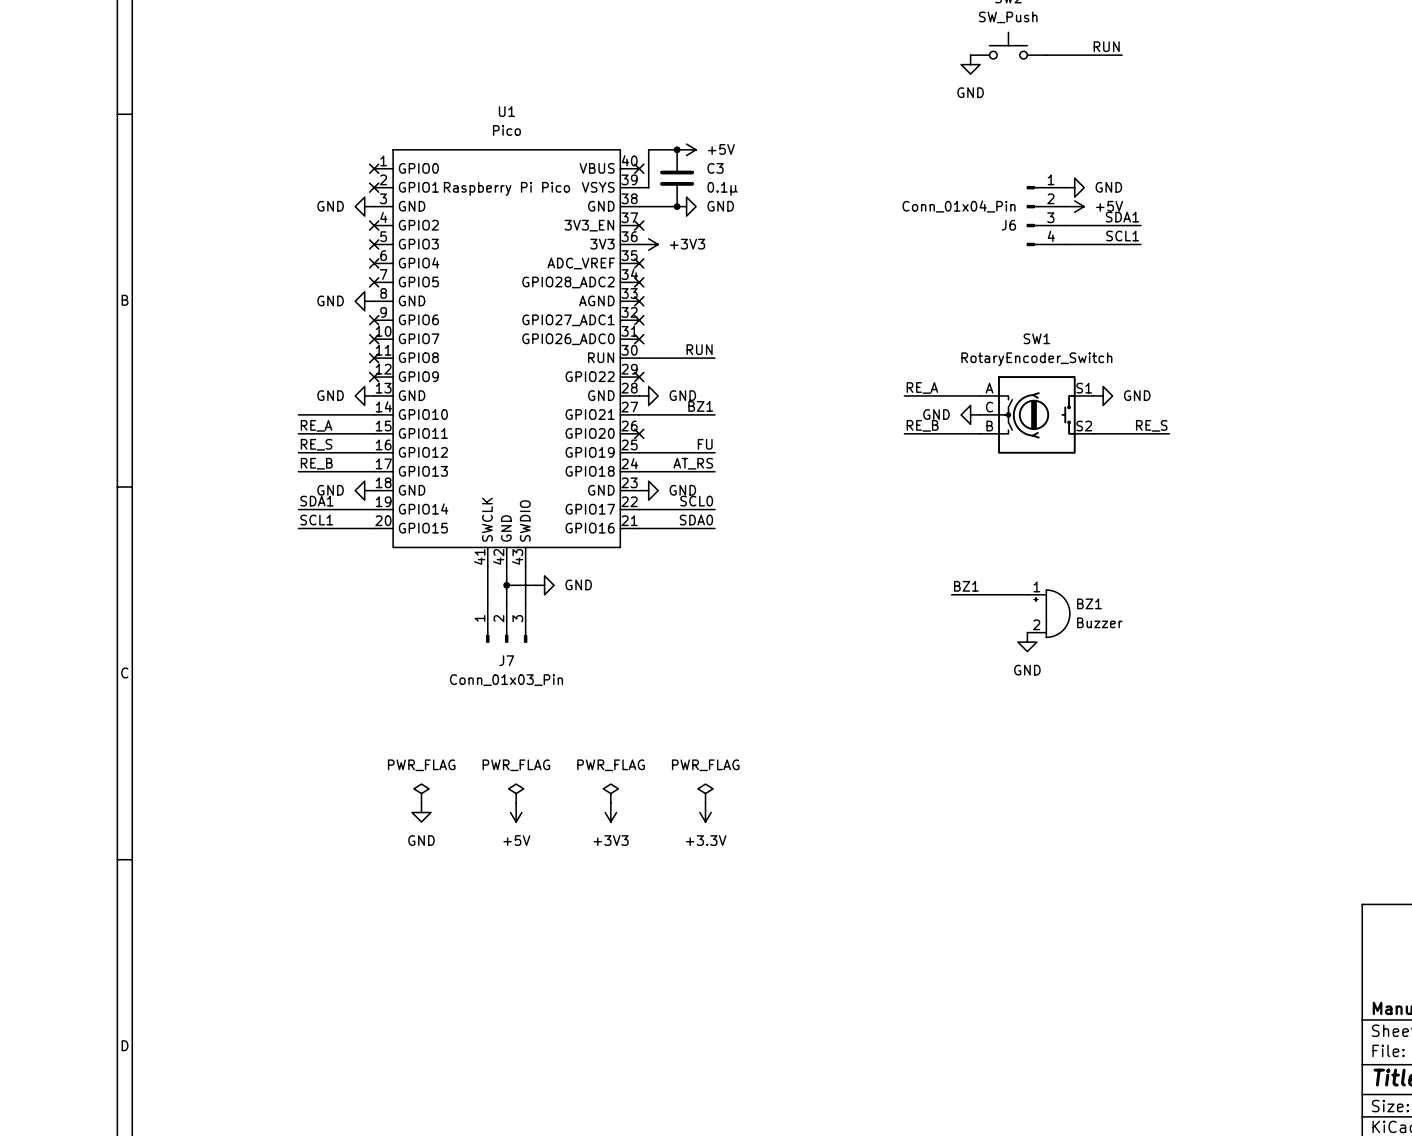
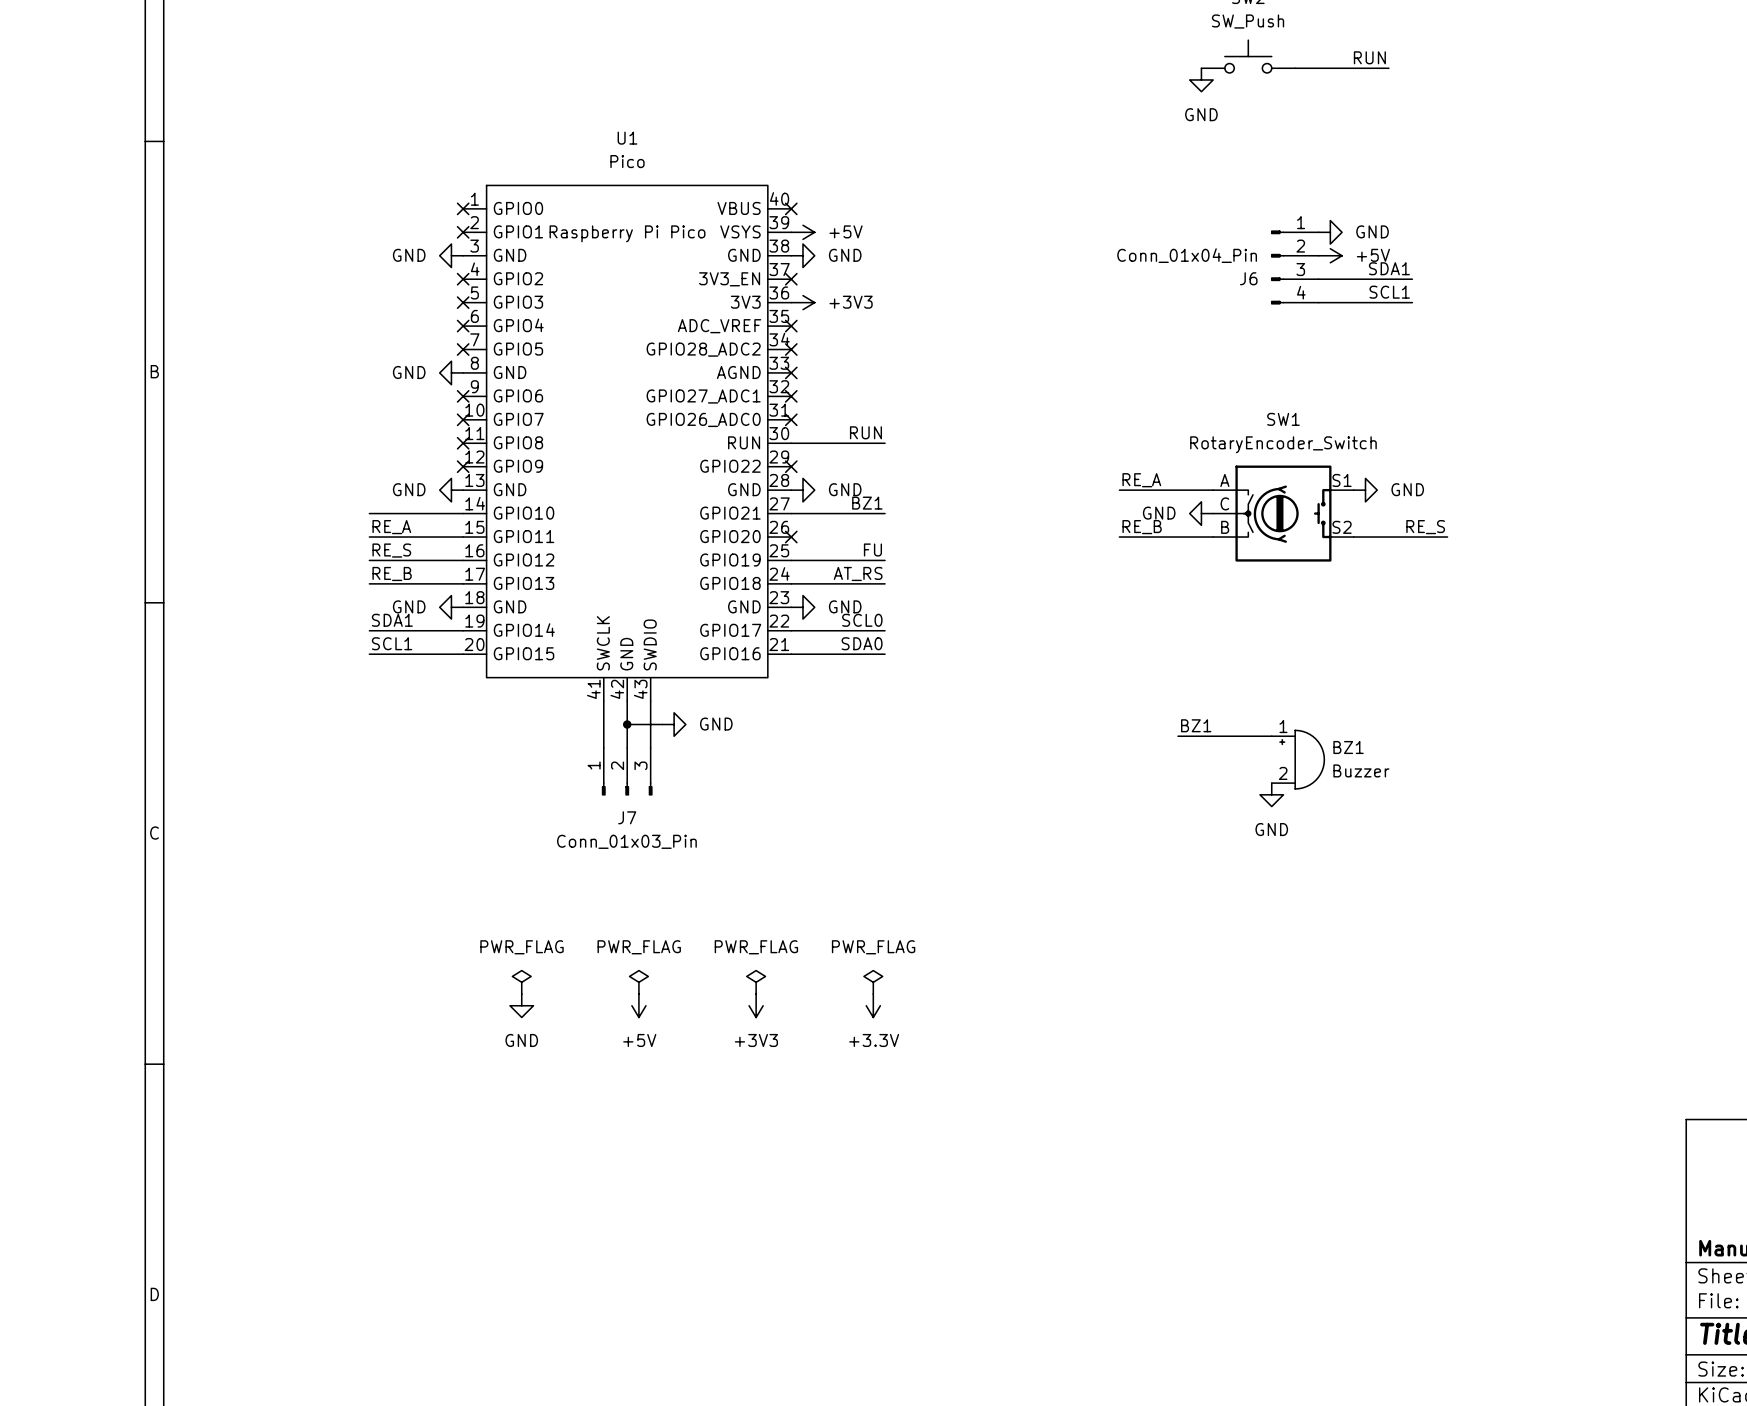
wire: (677, 149) (648, 149) (648, 187) (639, 187) -> none
junction: (677, 149) -> none
power symbol position: +5V (686, 149) -> +5V (802, 232)
C3: 0.1μ (677, 178) -> none
wire: (639, 206) (677, 206) -> none
junction: (677, 206) -> none
power symbol position: GND (686, 206) -> GND (802, 255)

